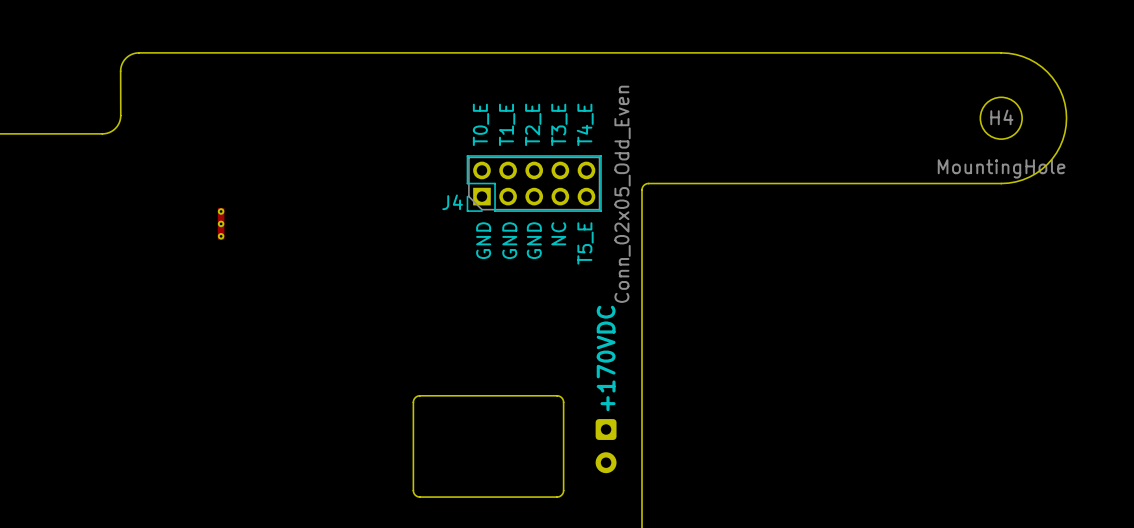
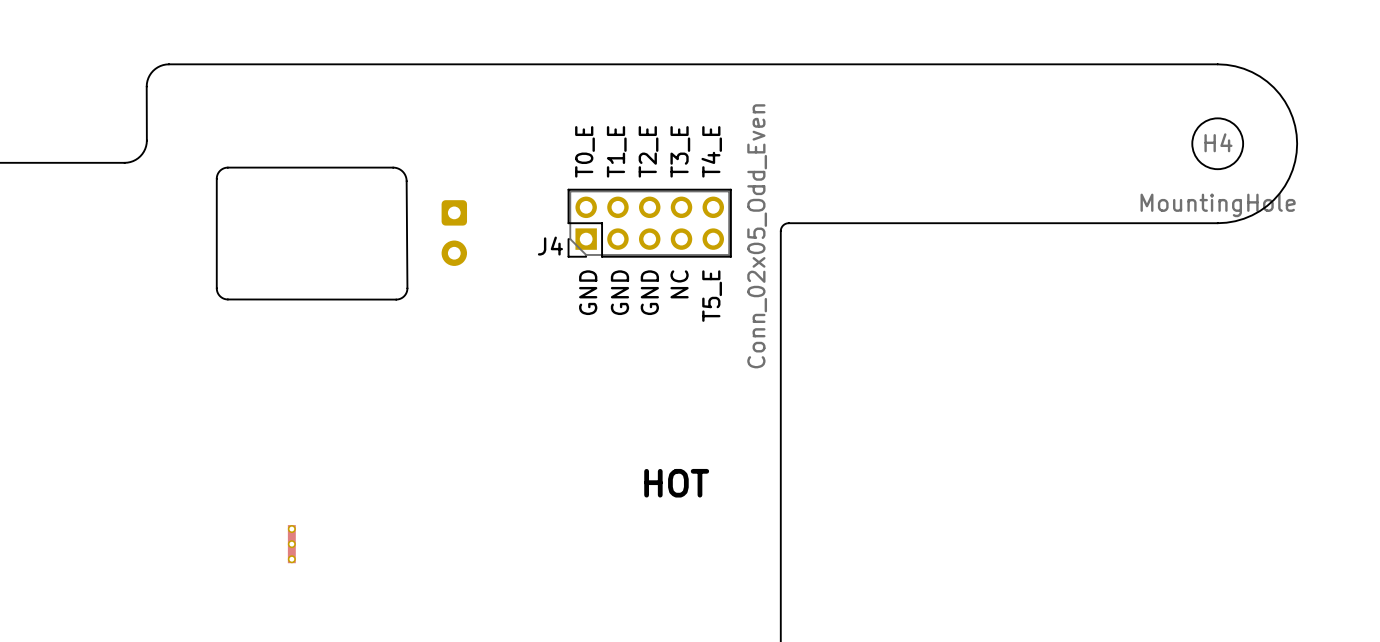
board edge: none -> (227, 167) (393, 167) (401, 170) (406, 181) (407, 288) (405, 295) (396, 299) (227, 299) (220, 297) (216, 288) (216, 178) (220, 170) (227, 167)
part: none -> (454, 233)
part: (221, 223) -> none
text: +170VDC (606, 358) -> none
board edge: (419, 395) (561, 397) (563, 402) (562, 494) (557, 497) (415, 495) (413, 490) (413, 402) (415, 397) (419, 395) -> none
text: none -> HOT (676, 483)
part: (606, 446) -> none
part: none -> (291, 544)

